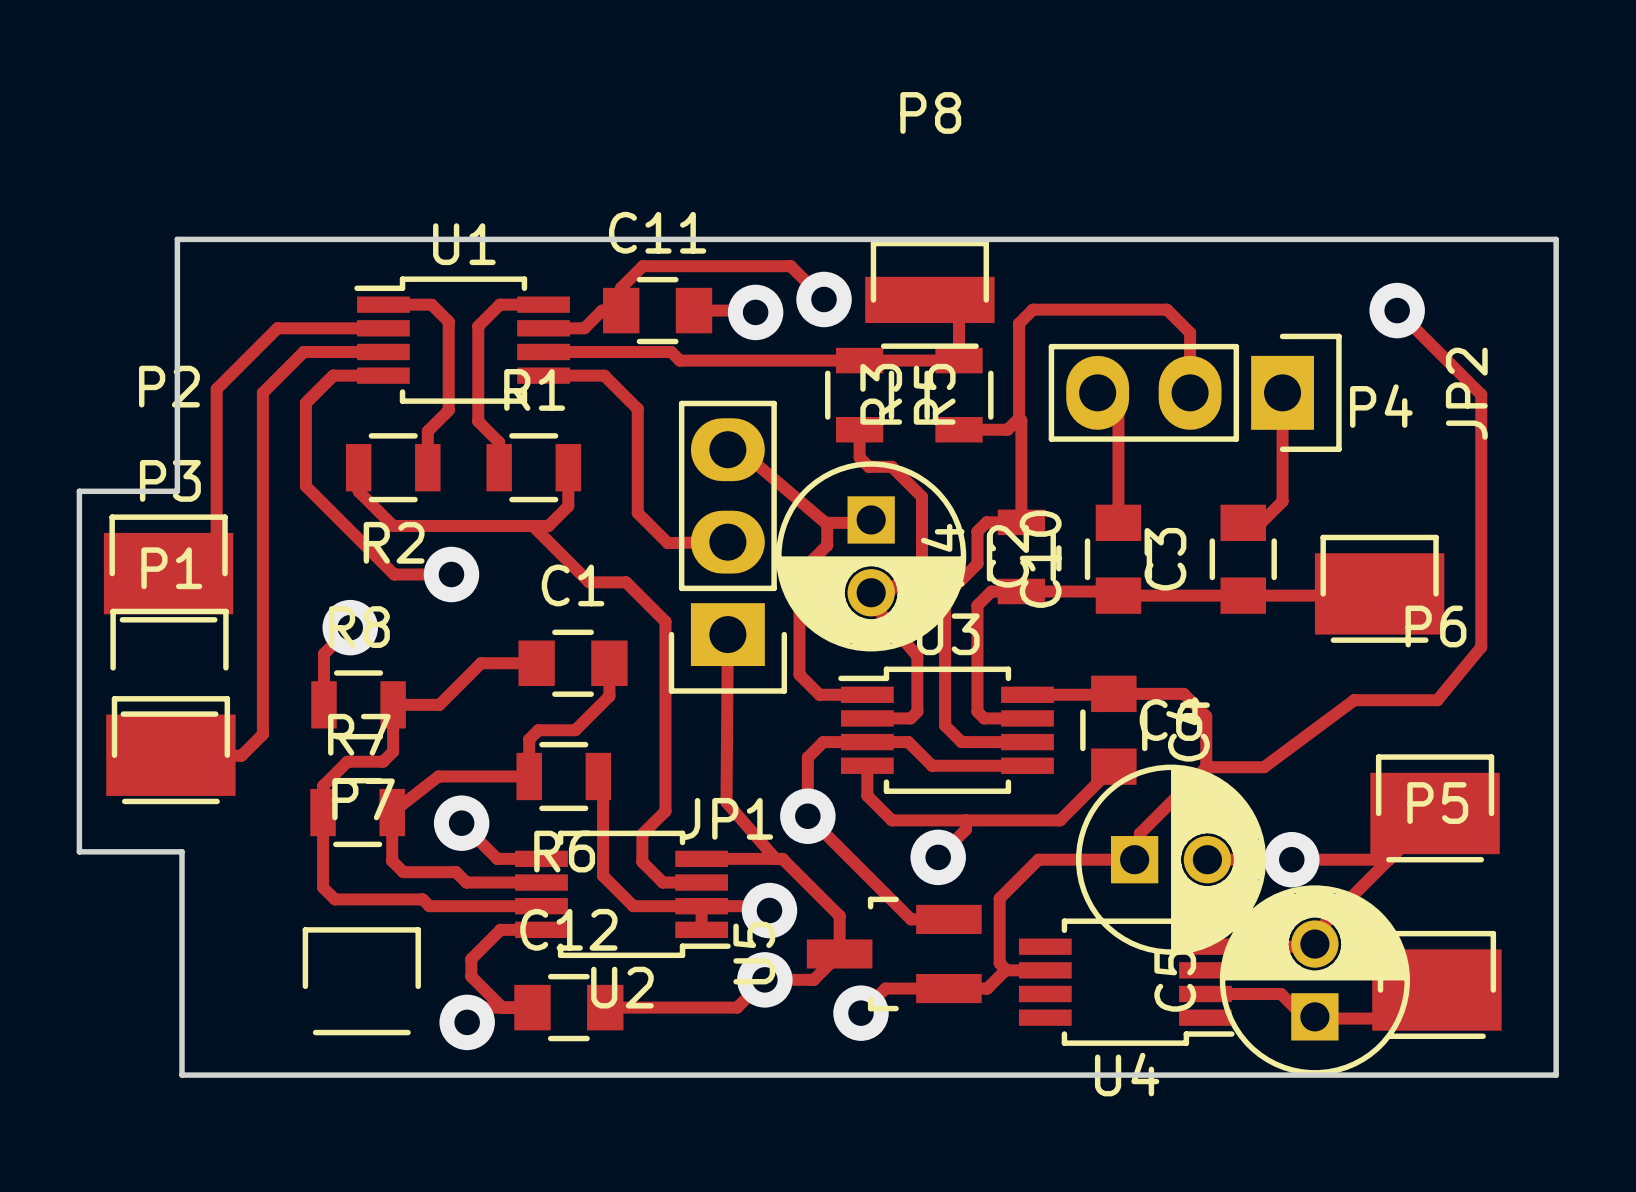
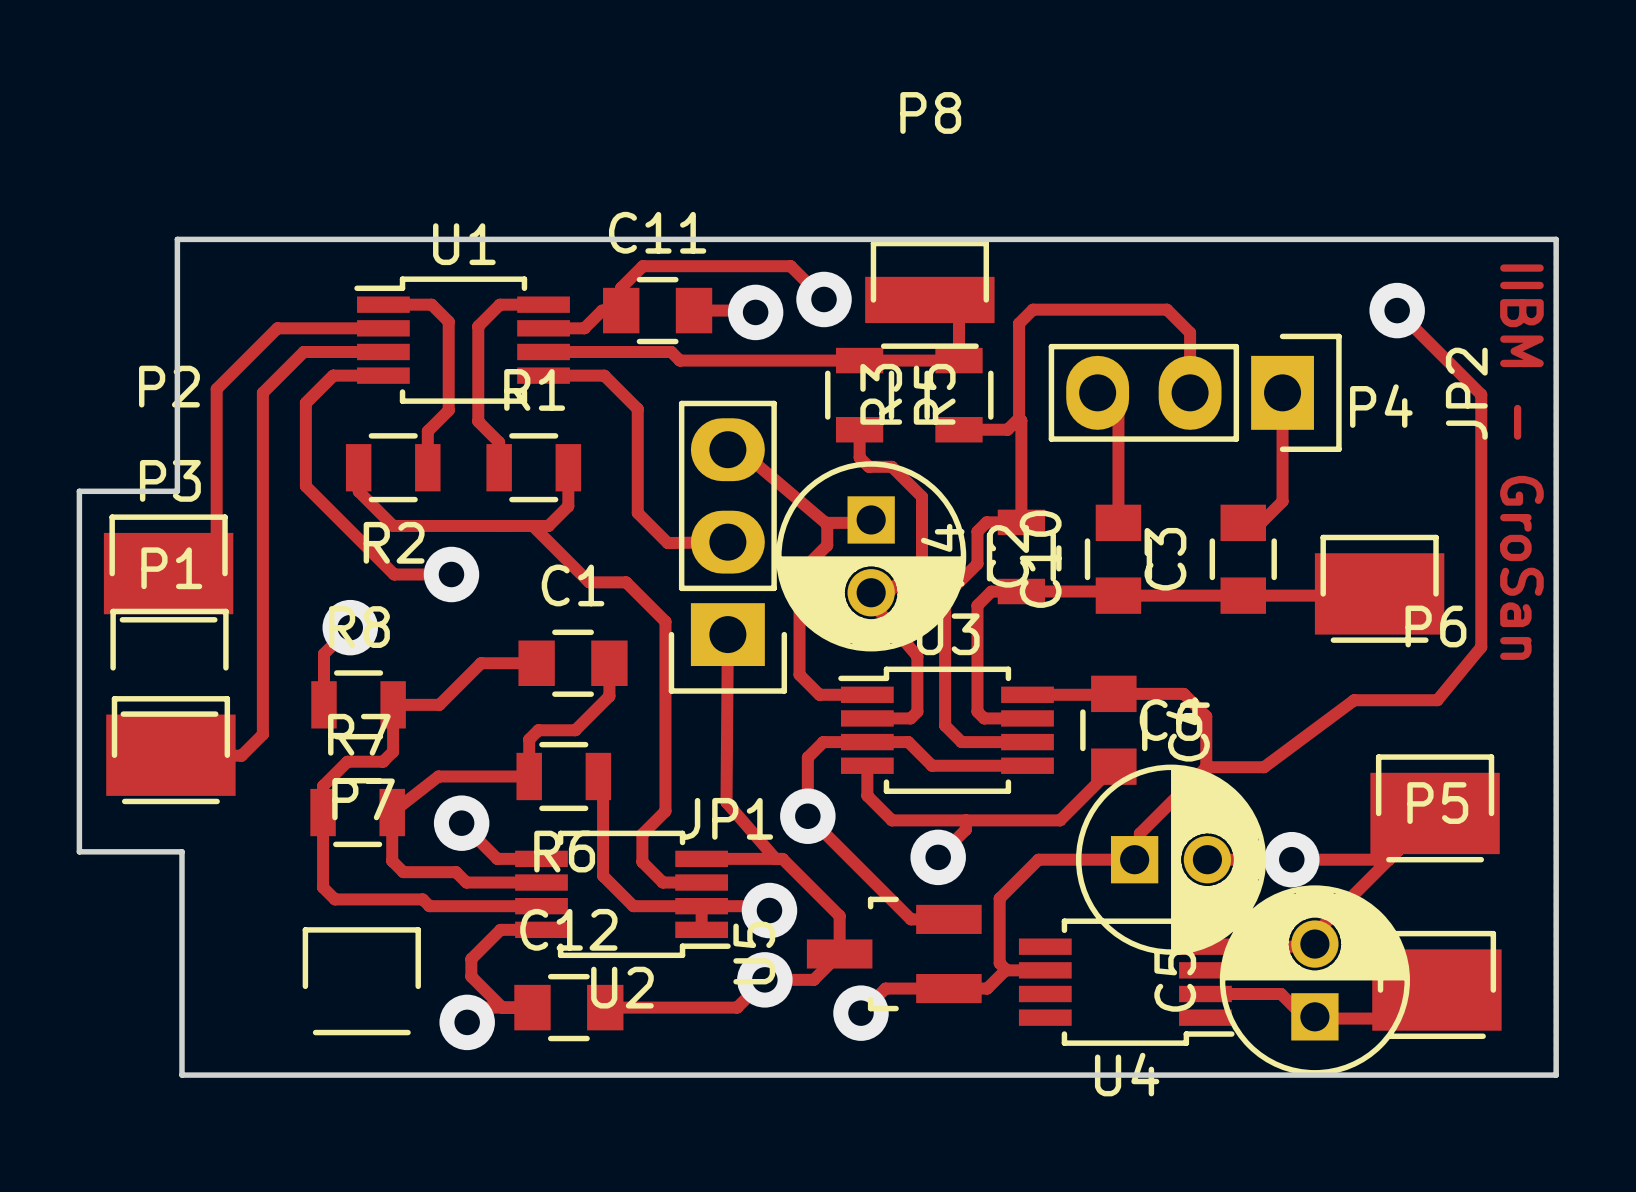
text: none -> IIBM - GroSan (1521, 462)

